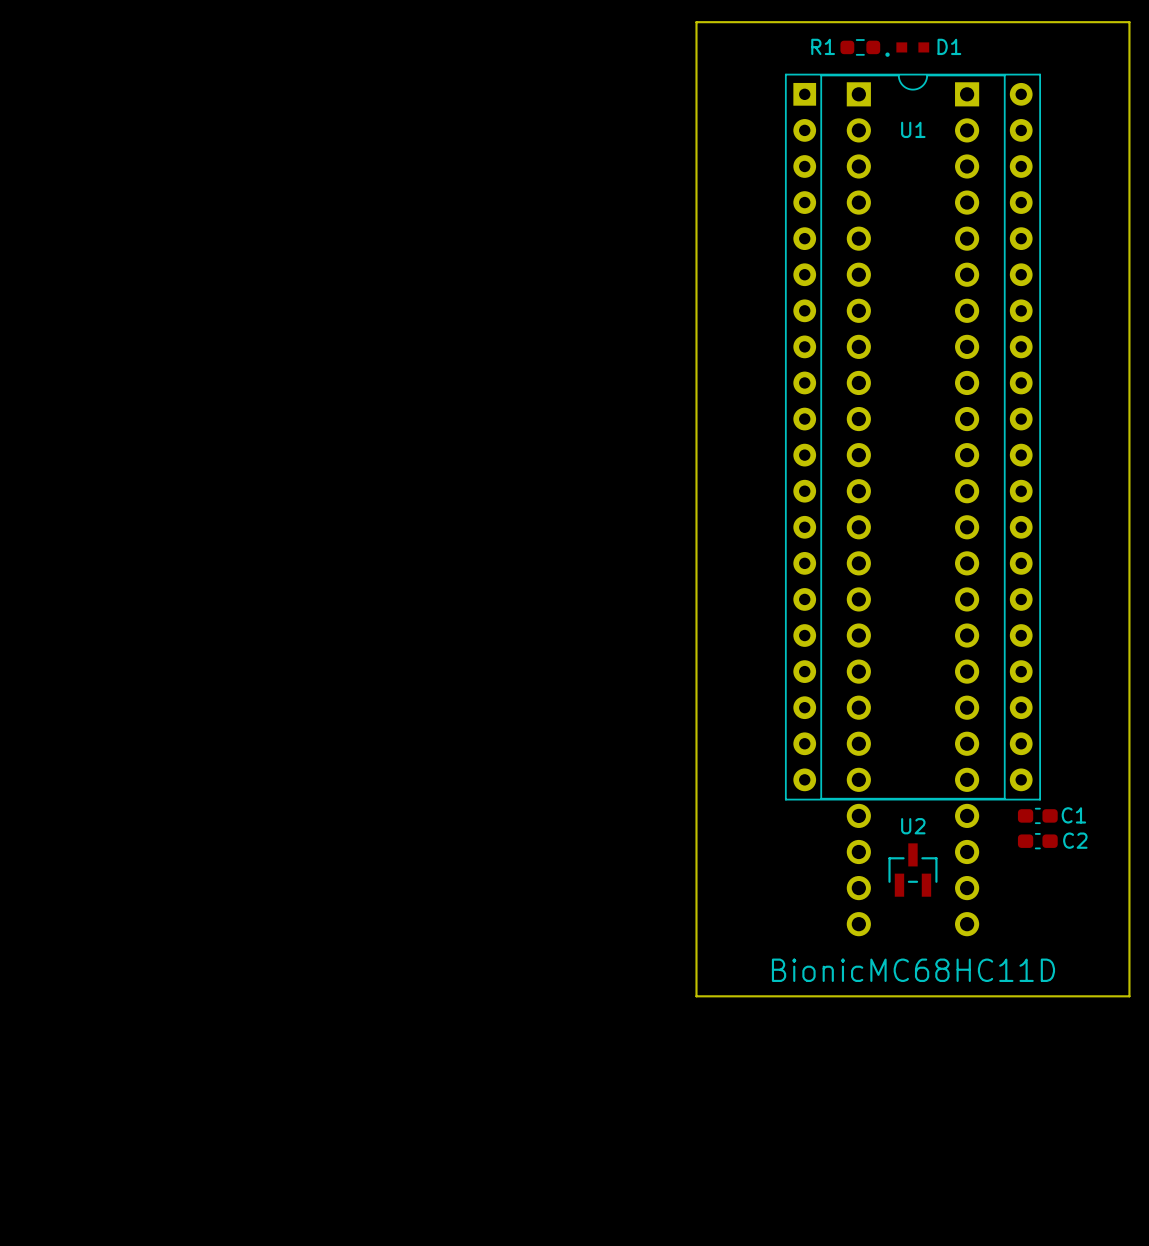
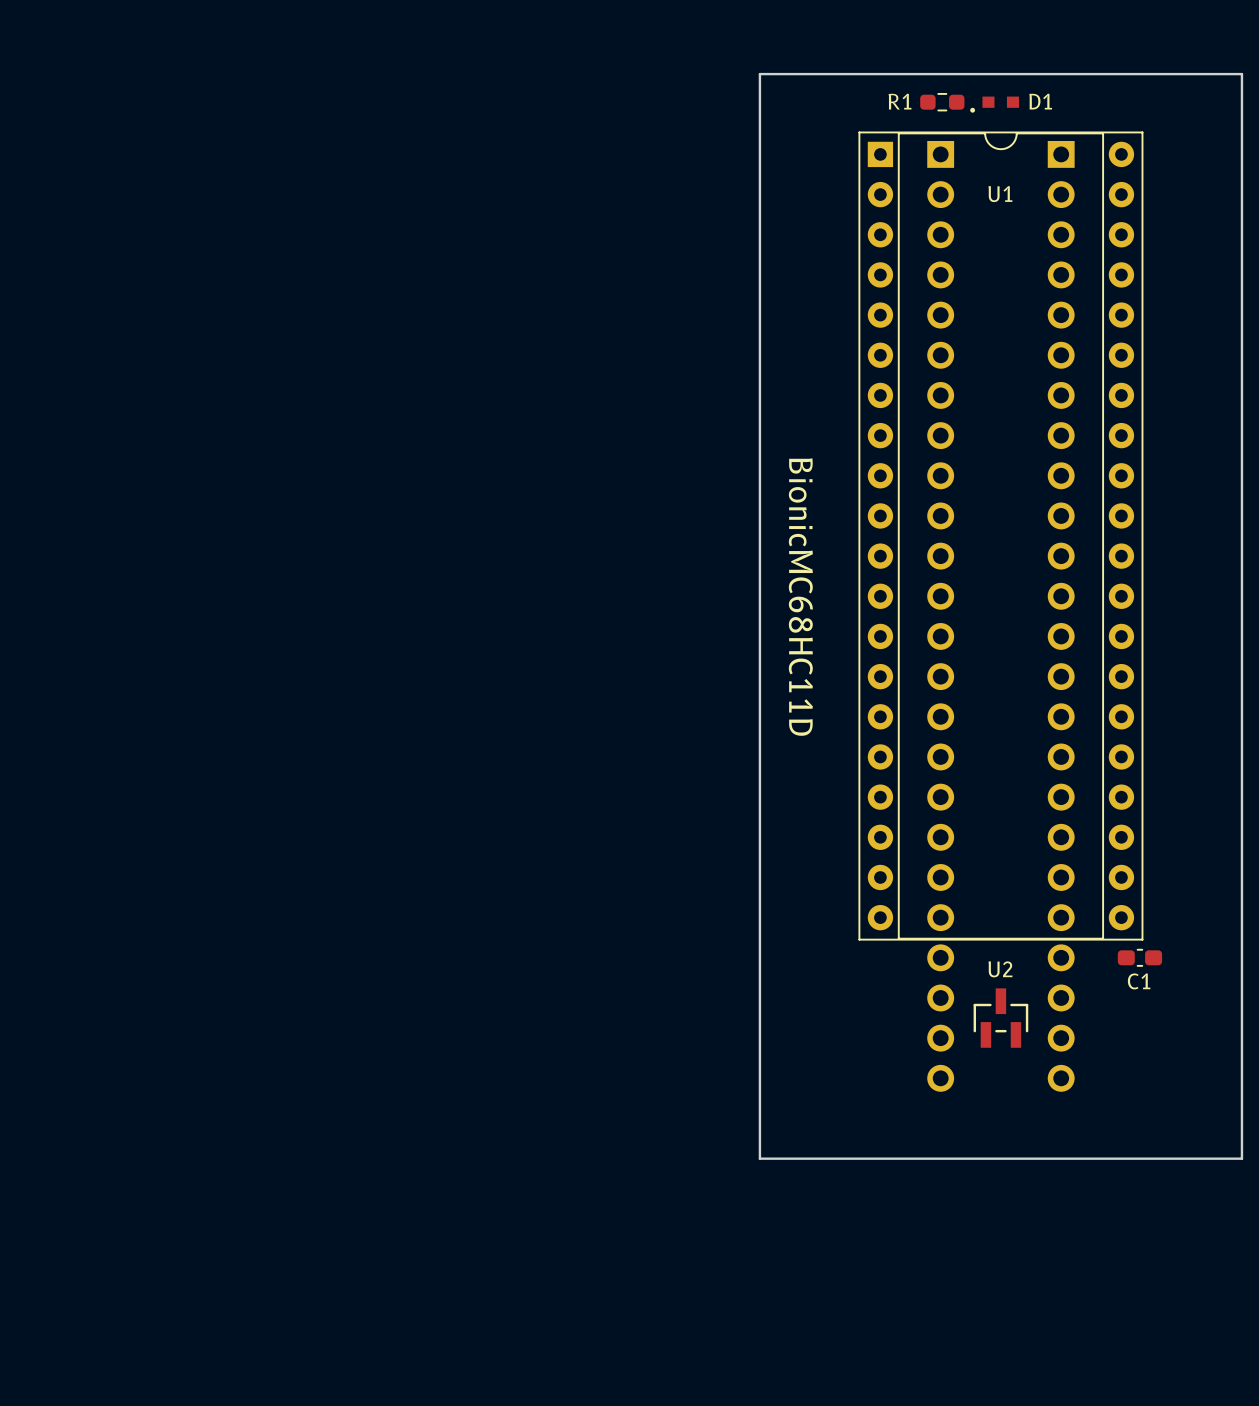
text: none -> BionicMC68HC11D (800, 597)
C1 name position: C1 (1073, 815) -> C1 (1139, 981)
C2: (1037, 841) -> none
text: BionicMC68HC11D (913, 970) -> none

